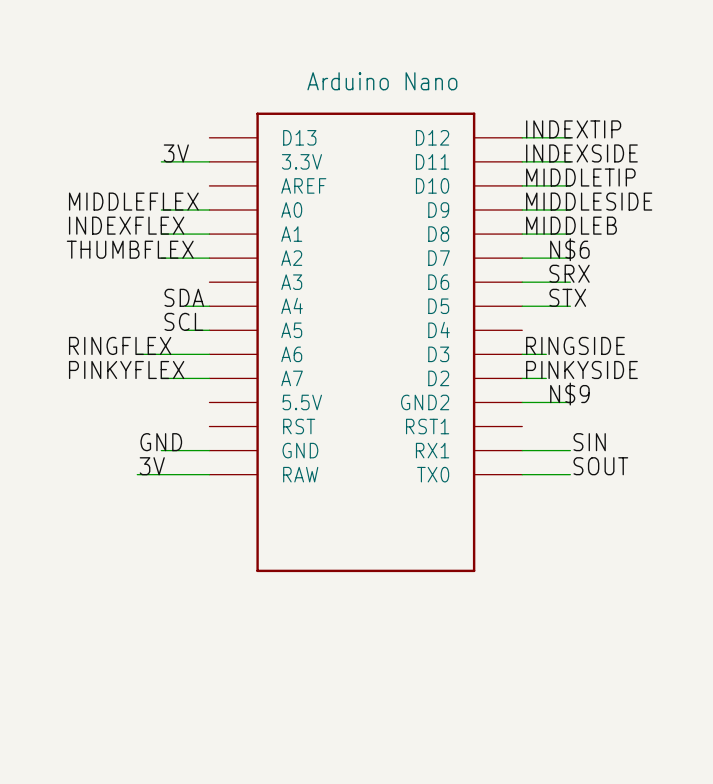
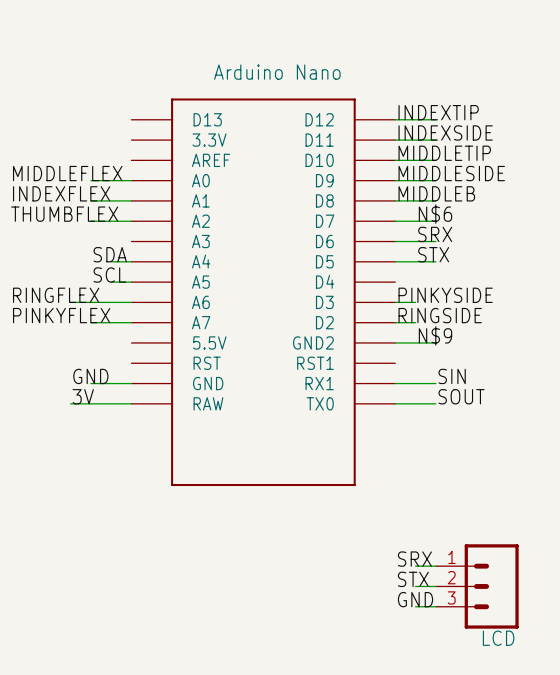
label: 3V (176, 153) -> none
wire: (161, 161) (209, 161) -> none
label: RINGSIDE (575, 345) -> PINKYSIDE (445, 295)
label: PINKYSIDE (581, 369) -> RINGSIDE (440, 315)
label: none -> SRX (414, 559)
wire: none -> (415, 566) (435, 566)
label: none -> STX (413, 579)
wire: none -> (415, 586) (435, 586)
LCD: none -> (477, 586)
label: none -> GND (415, 599)
wire: none -> (415, 606) (435, 606)

